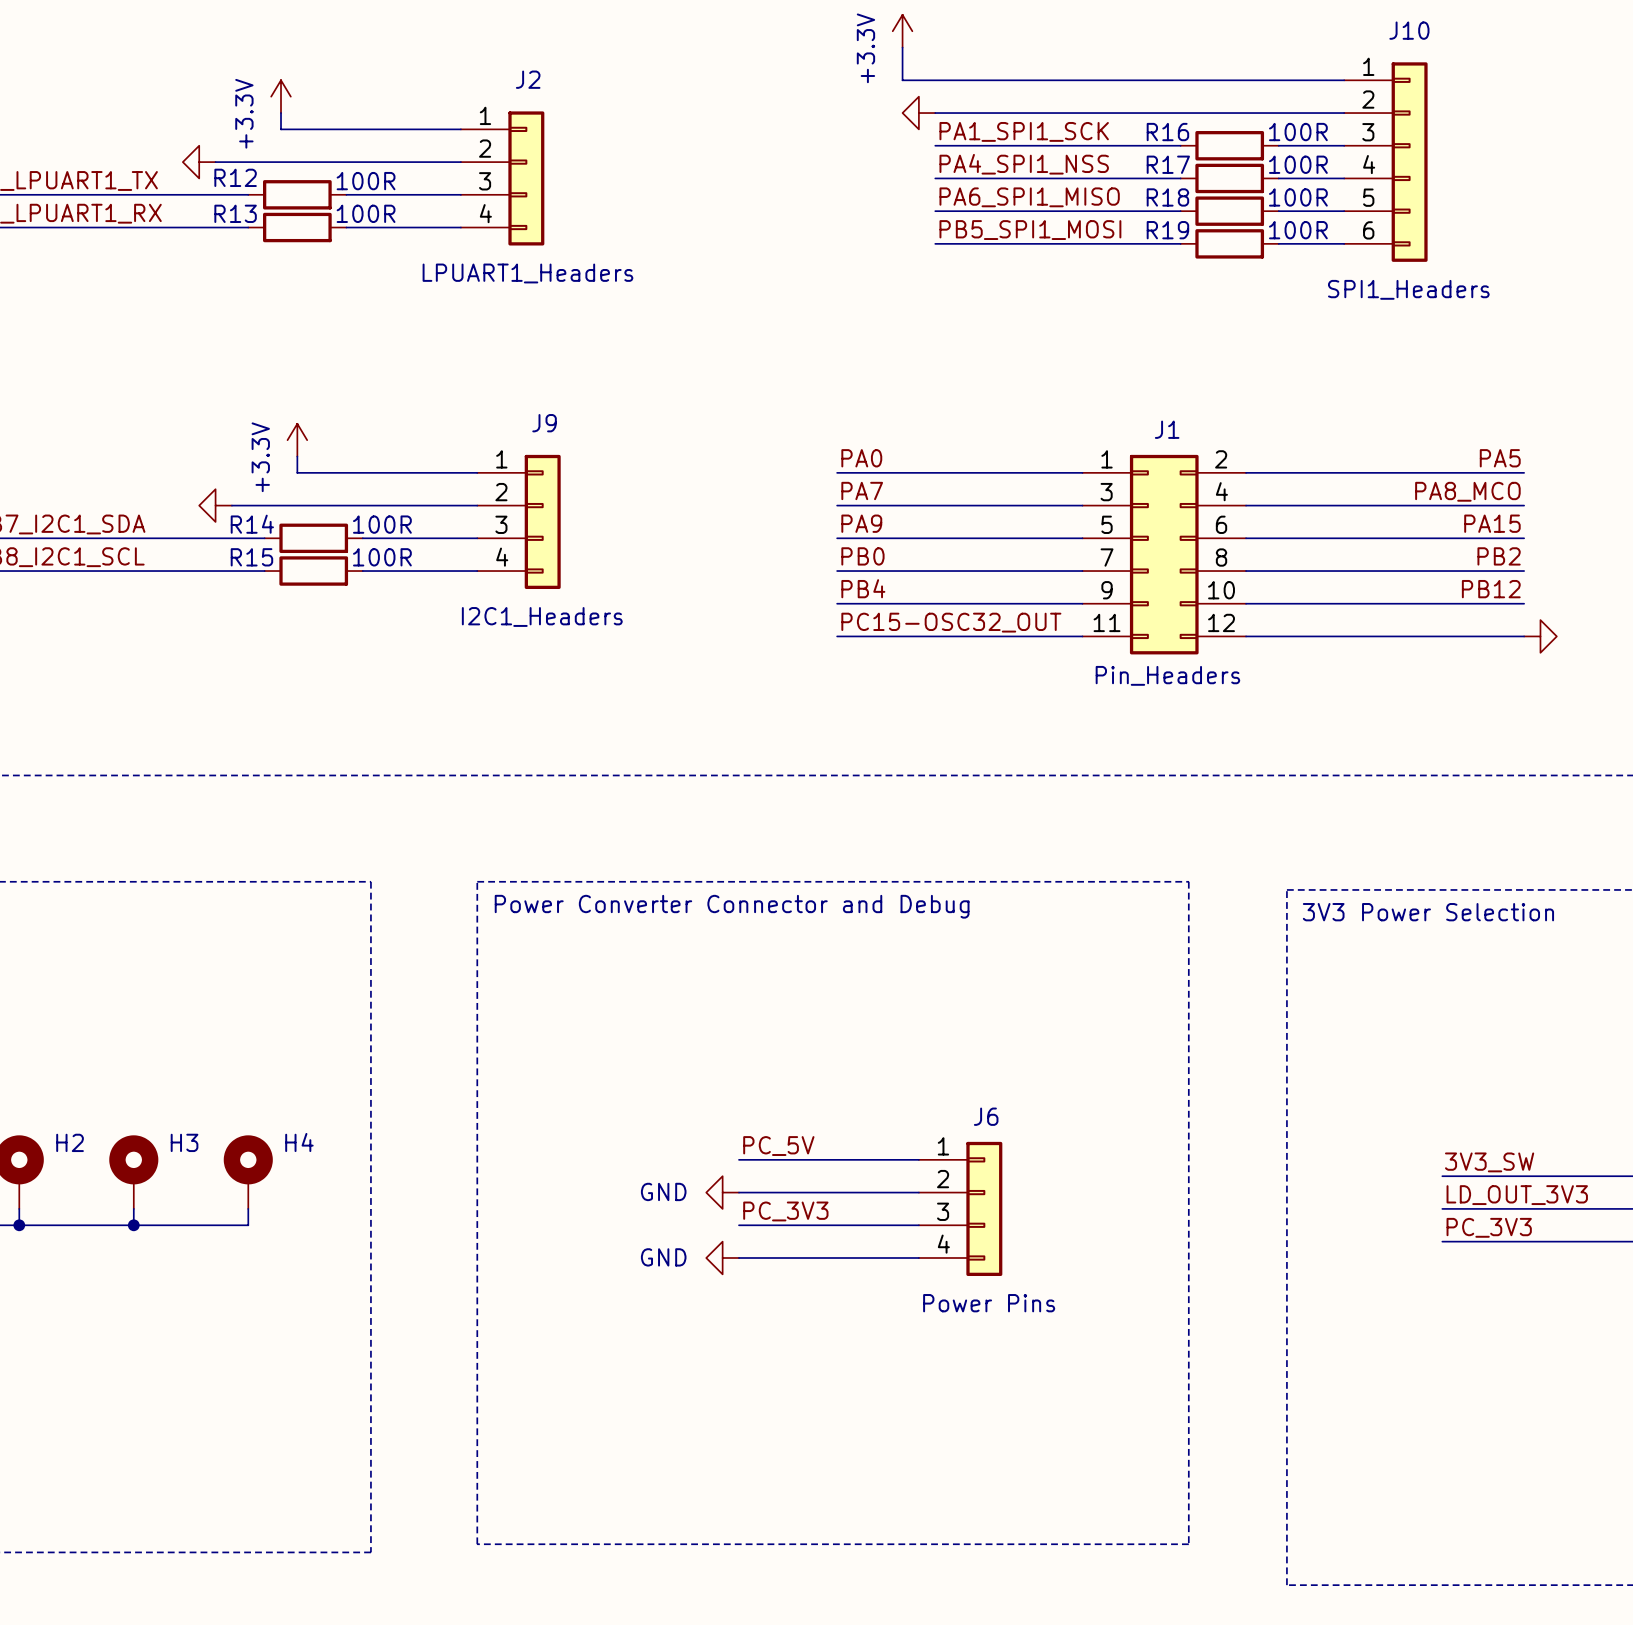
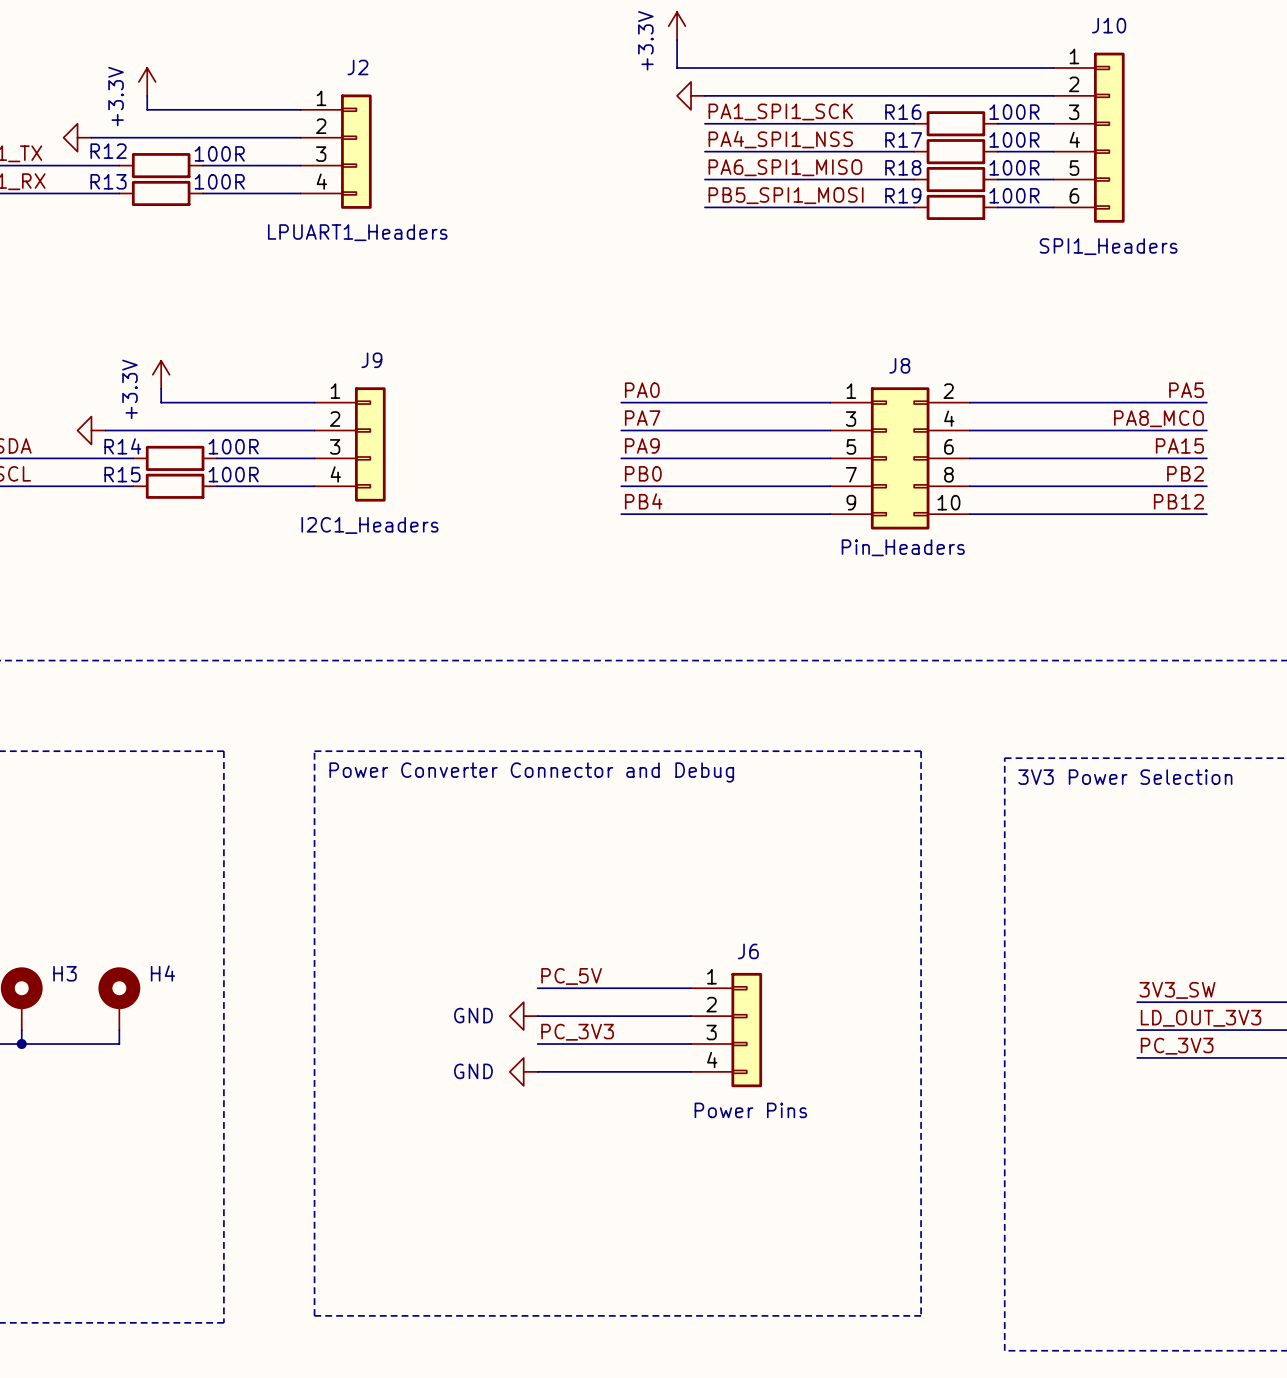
J8: none -> Pin_Headers (900, 458)
J1: Pin_Headers (1164, 554) -> none
label: PC15-OSC32_OUT (951, 622) -> none
wire: (837, 636) (1082, 636) -> none
wire: (1246, 636) (1524, 636) -> none
power symbol: (1540, 636) -> none

